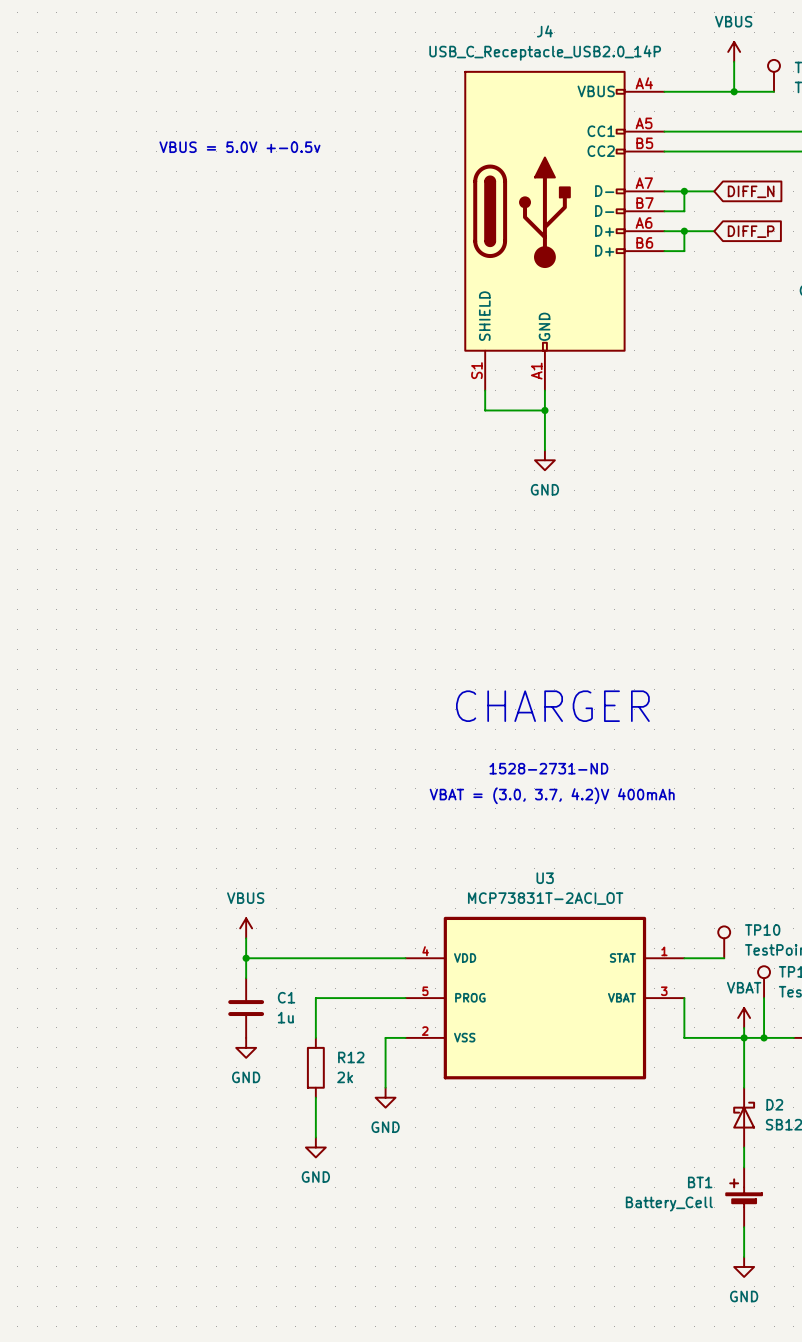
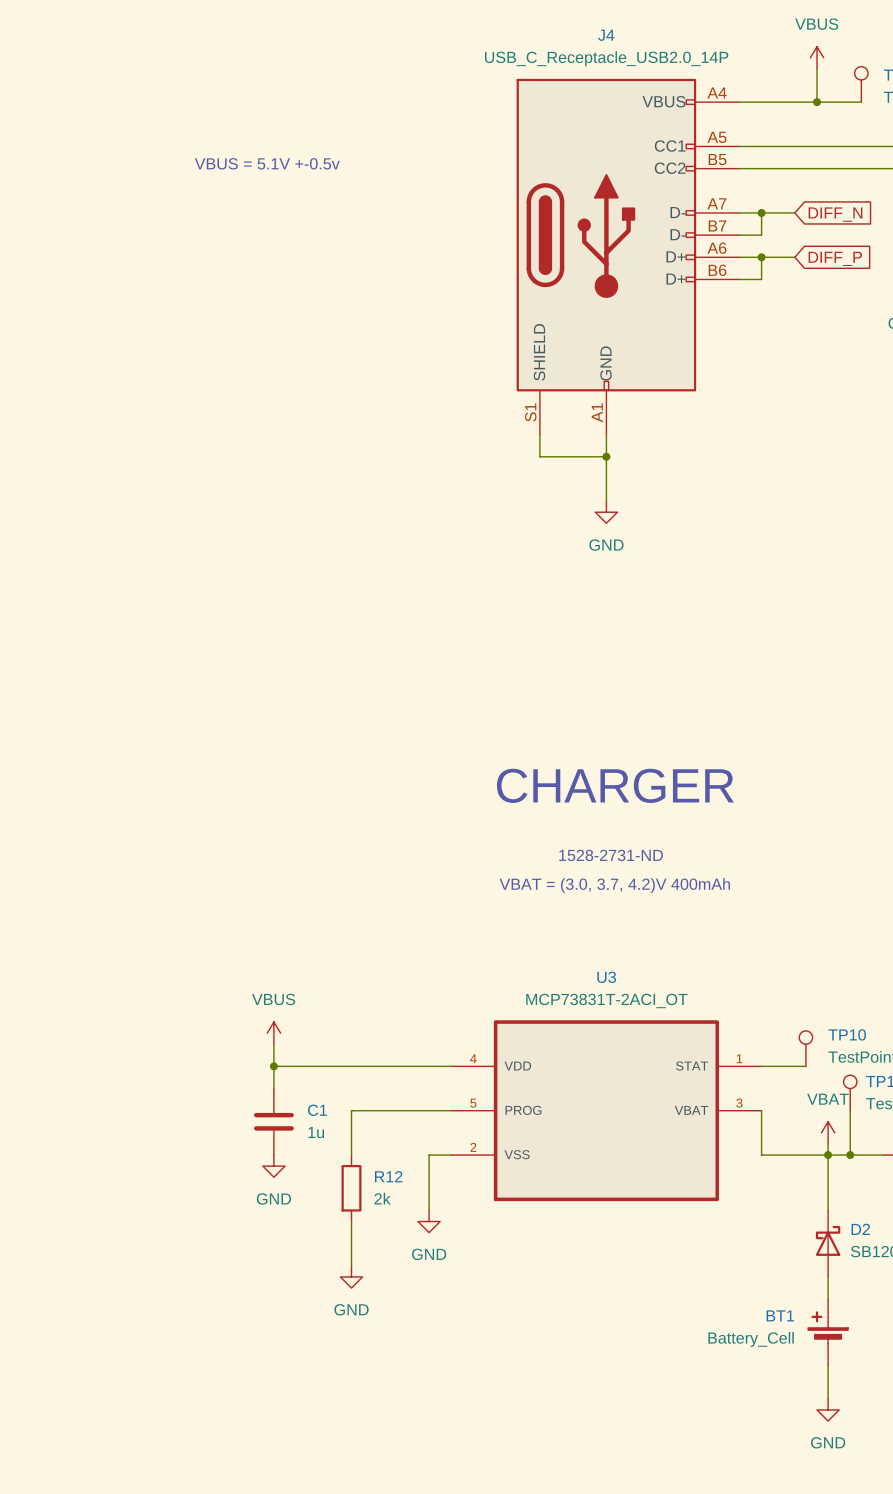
text: VBUS = 5.0V +-0.5v (239, 147) -> VBUS = 5.1V +-0.5v (267, 163)

